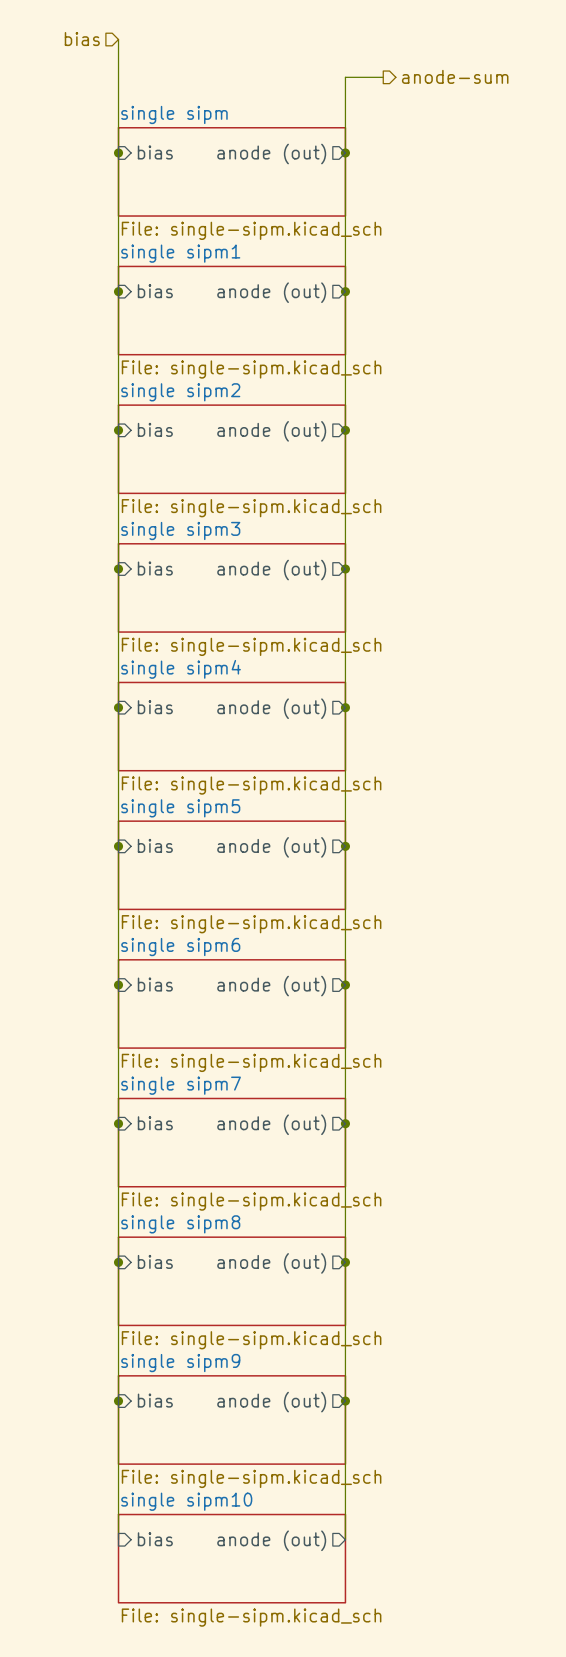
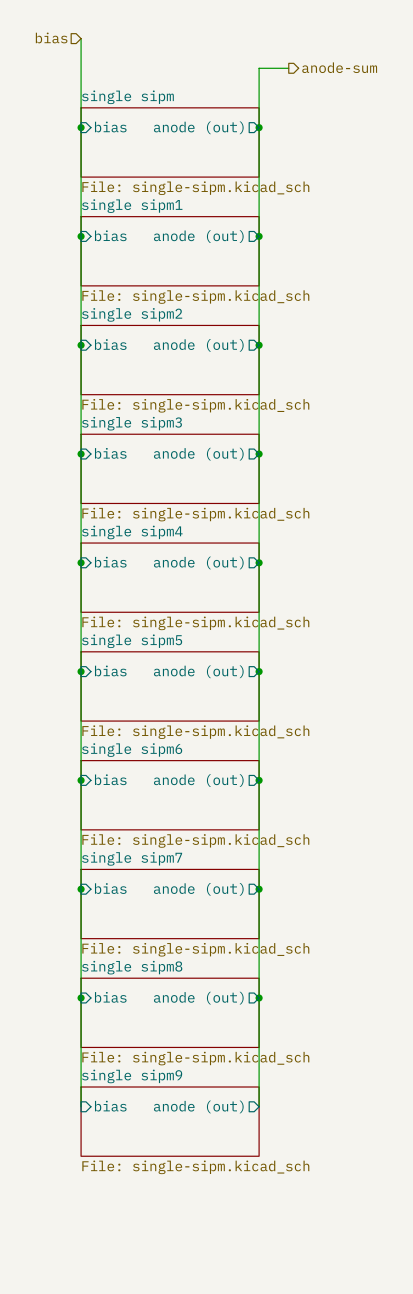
wire: (118, 1401) (118, 1539) -> none
junction: (118, 1401) -> none
wire: (345, 1401) (345, 1539) -> none
junction: (345, 1401) -> none
sheet pin: bias (155, 1539) -> none
sheet pin: anode (out) (271, 1540) -> none
sheet single sipm10: File: single-sipm.kicad_sch (231, 1558) -> none

